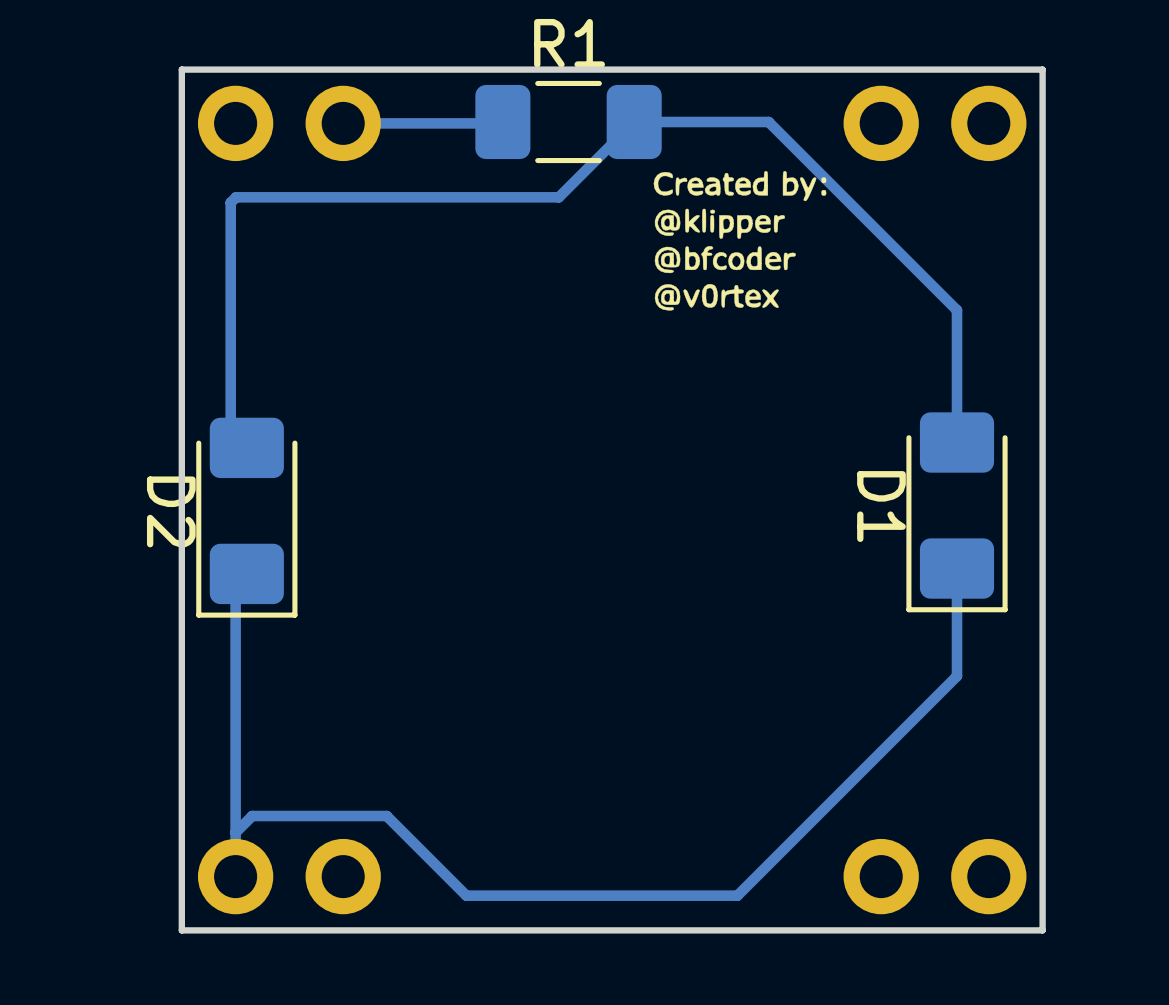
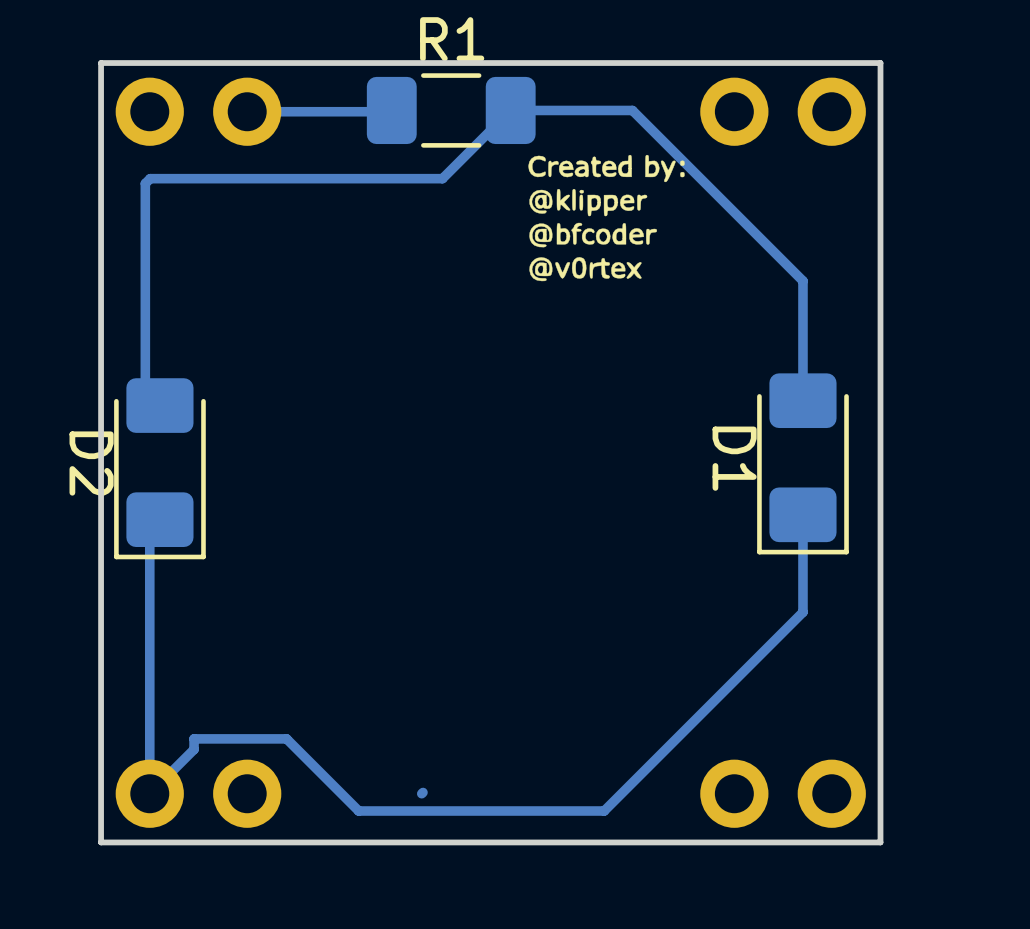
bottom track: (284, 816) (252, 816) (235, 832) -> (194, 738) (194, 749) (149, 793)
bottom track: none -> (423, 792) (421, 793)

